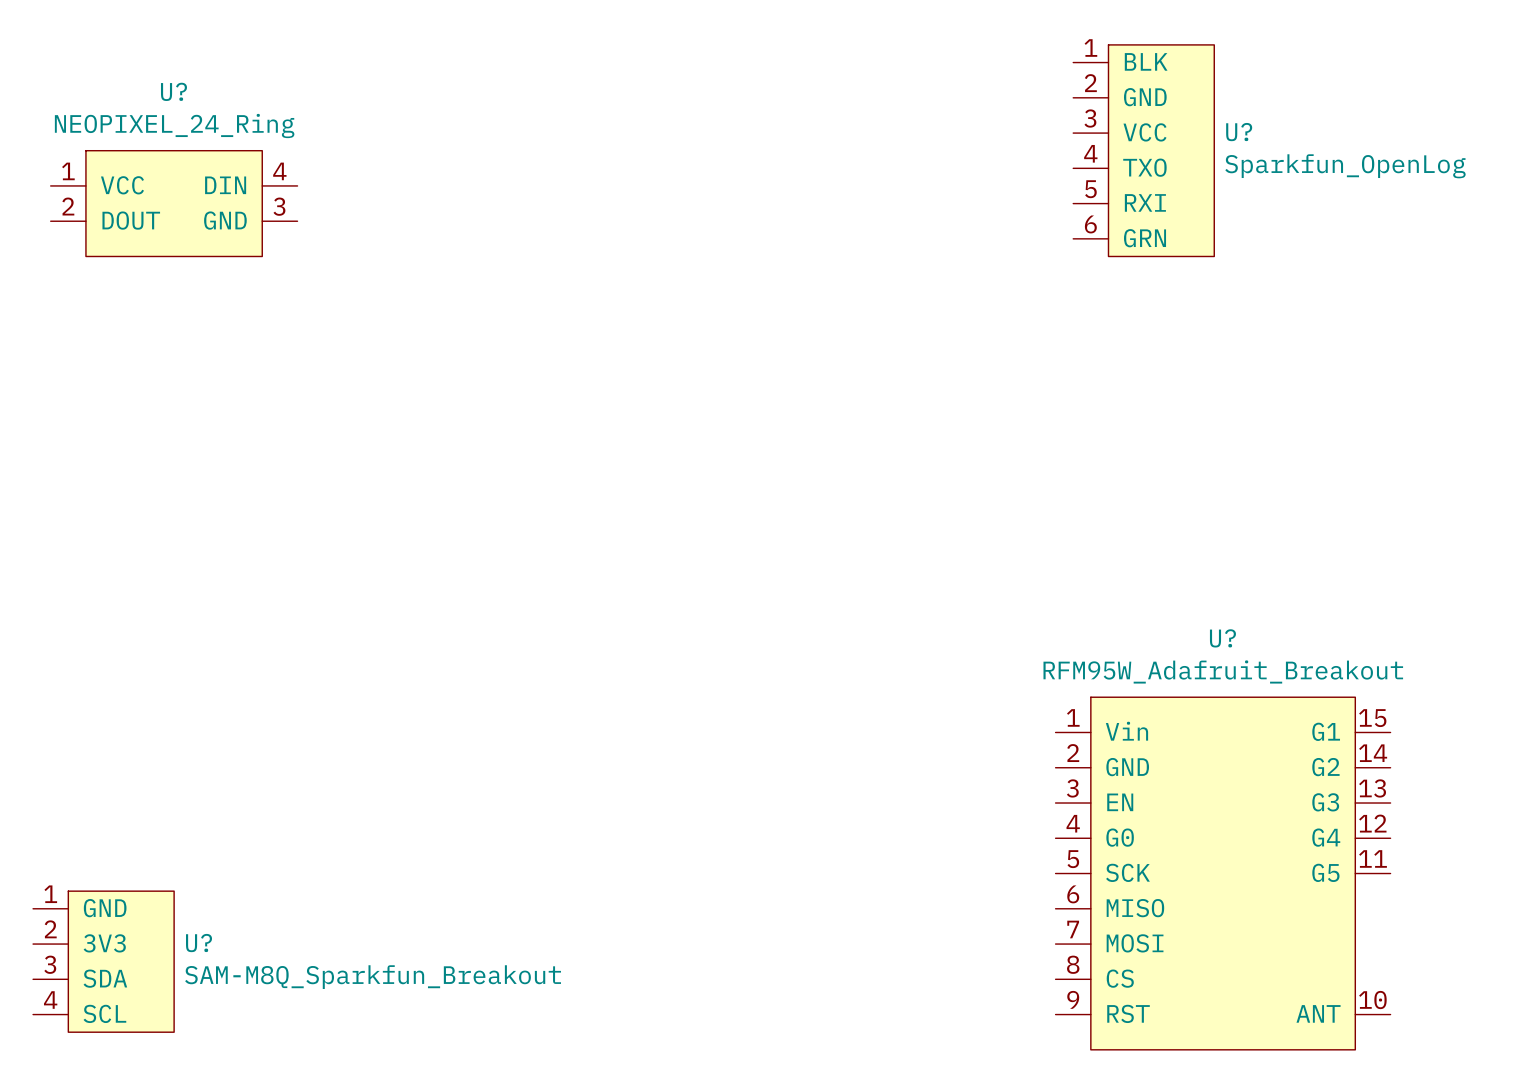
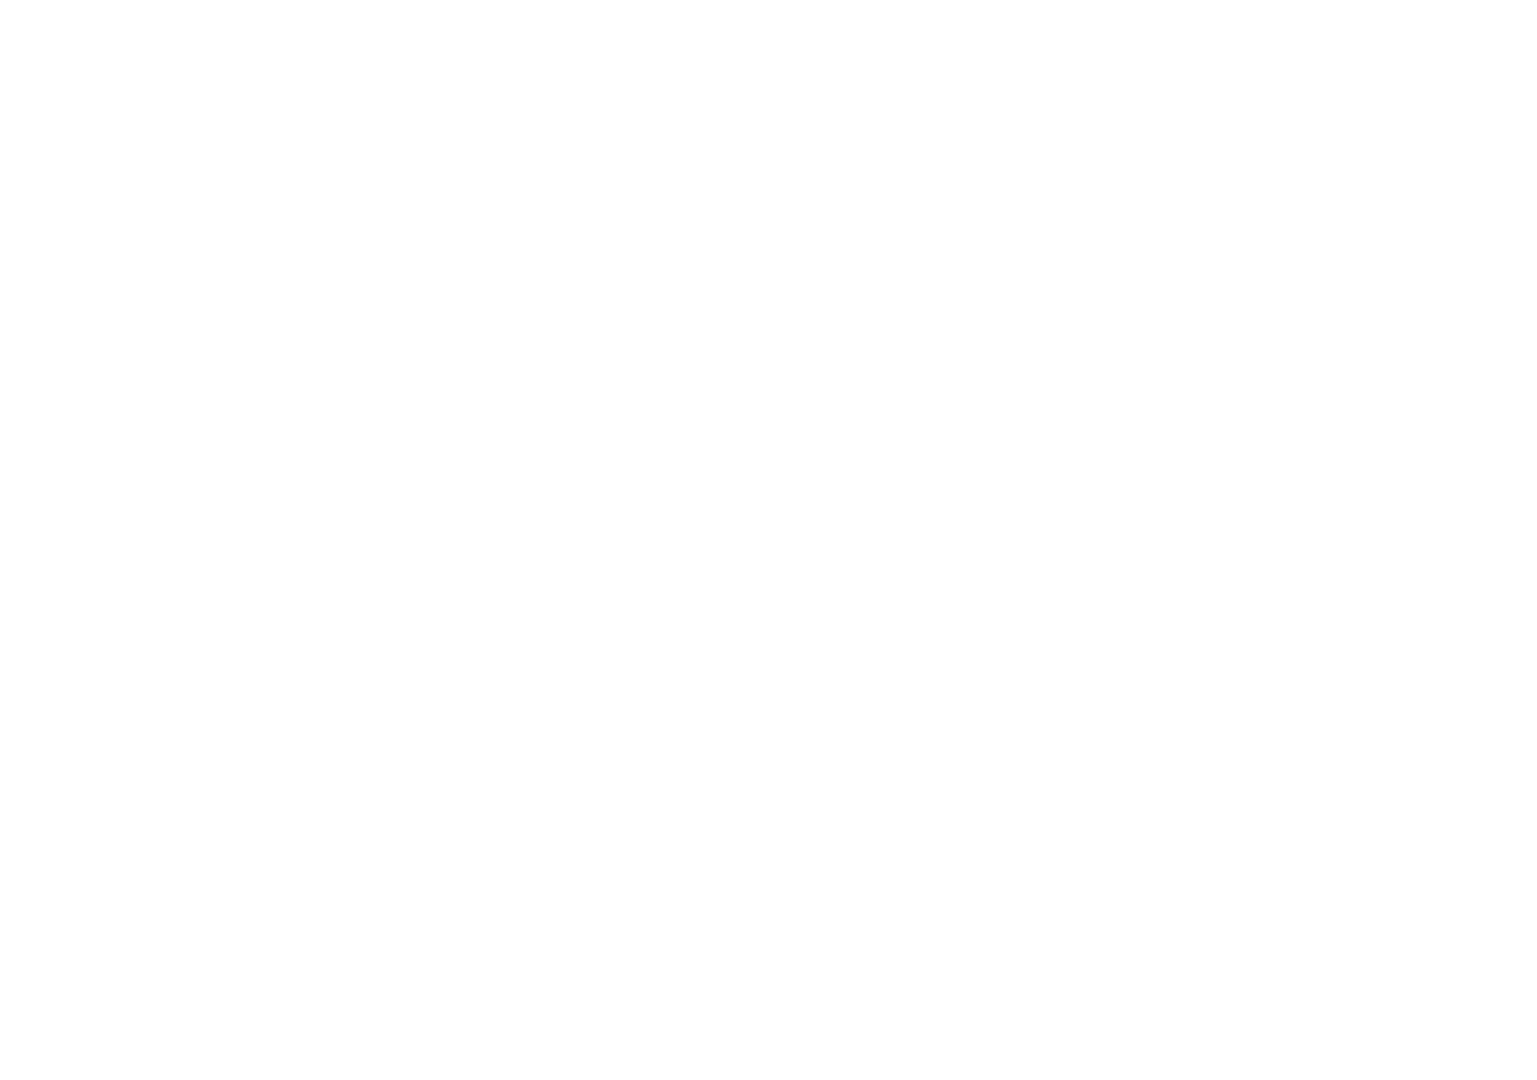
U?: Sparkfun_OpenLog (1143, 150) -> none
U?: NEOPIXEL_24_Ring (174, 203) -> none
U?: RFM95W_Adafruit_Breakout (1223, 873) -> none
U?: SAM-M8Q_Sparkfun_Breakout (103, 961) -> none

